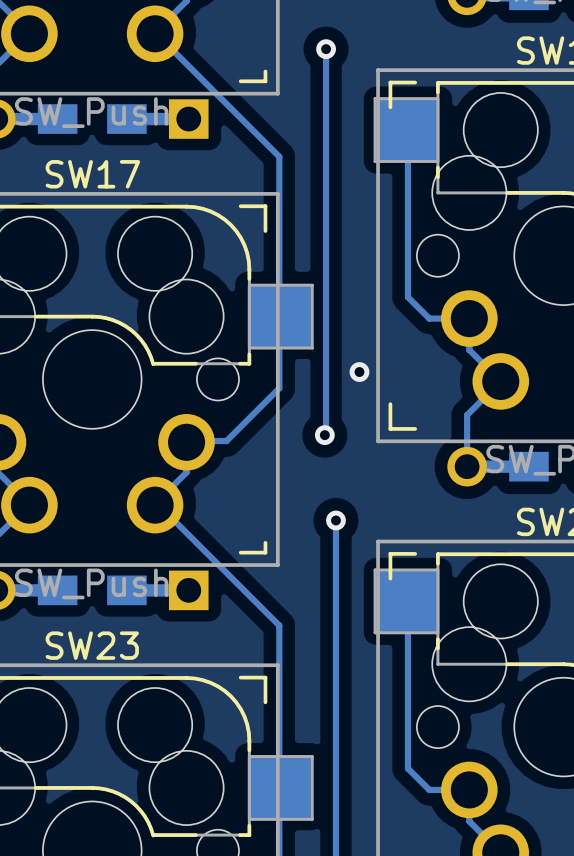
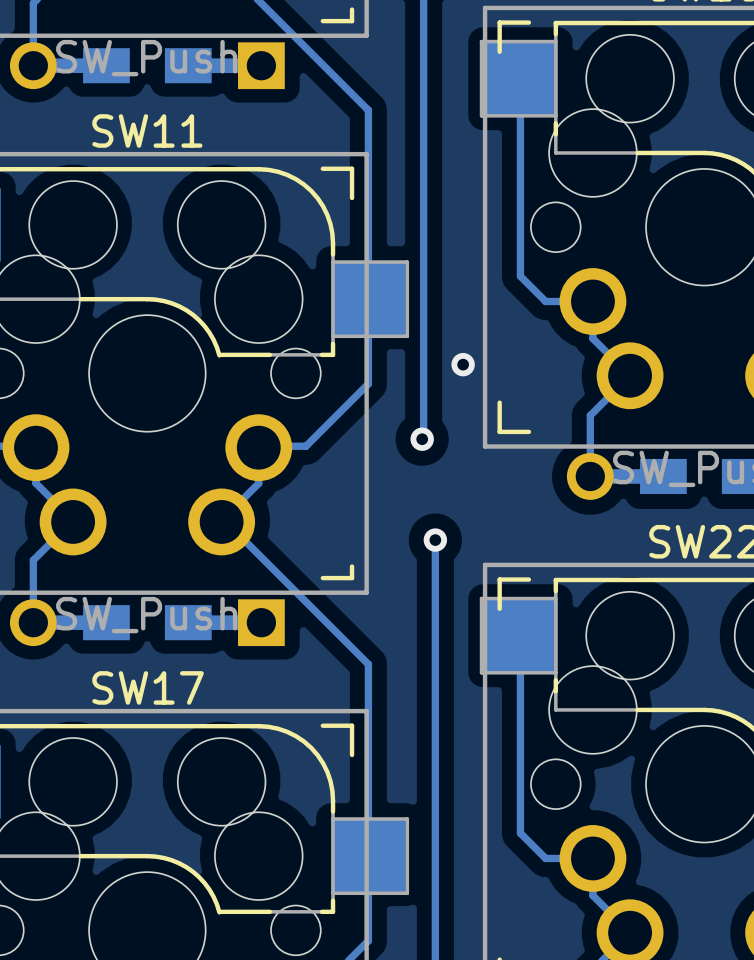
SW17 name: SW17 (92, 174) -> SW11 (147, 130)
SW23 name: SW23 (92, 645) -> SW17 (148, 687)

